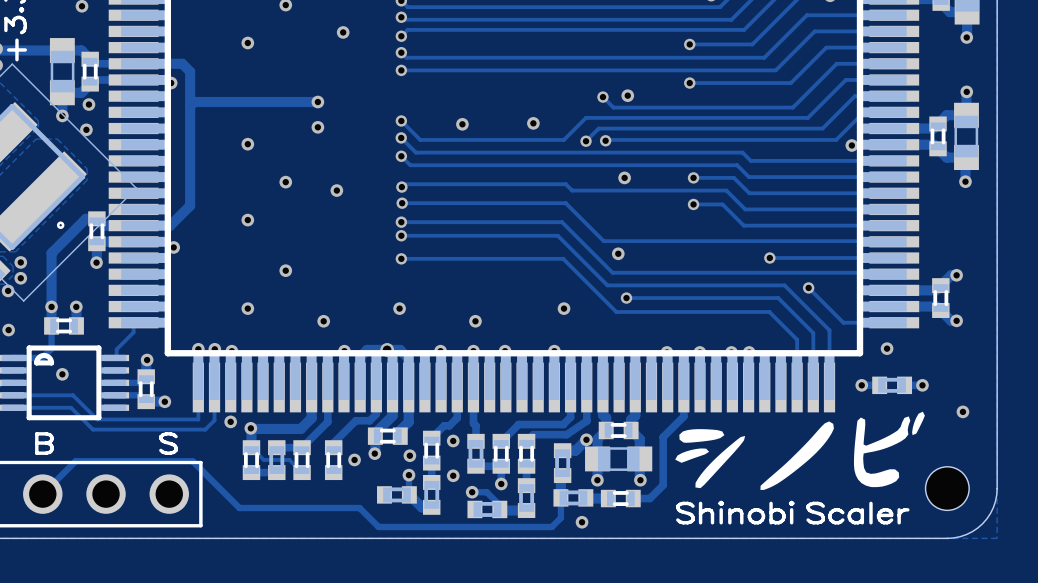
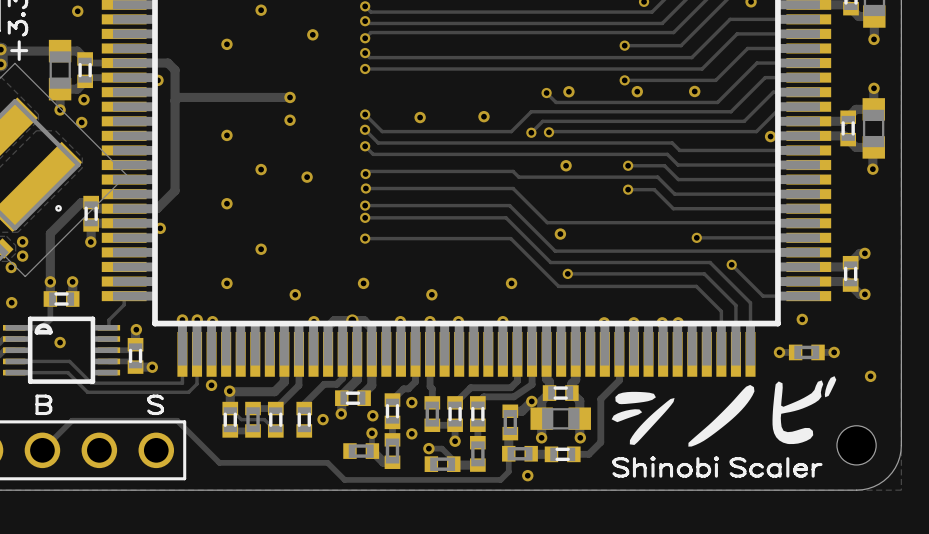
via: none -> (637, 91)
via: none -> (694, 91)

